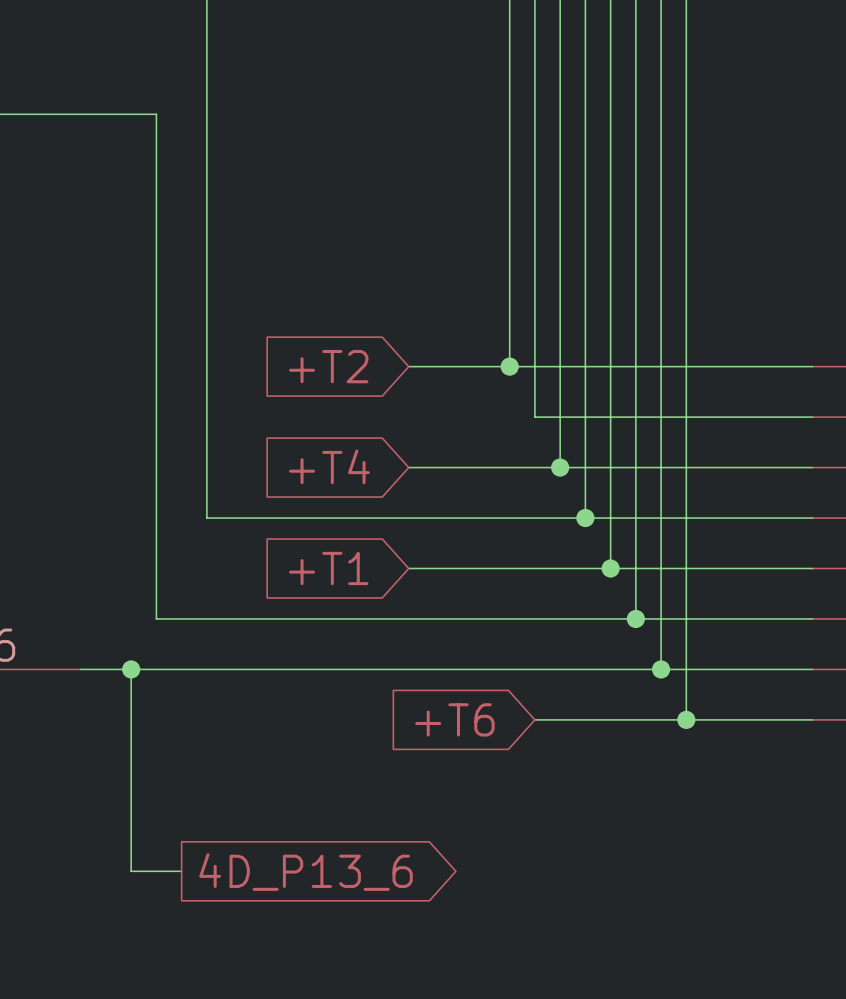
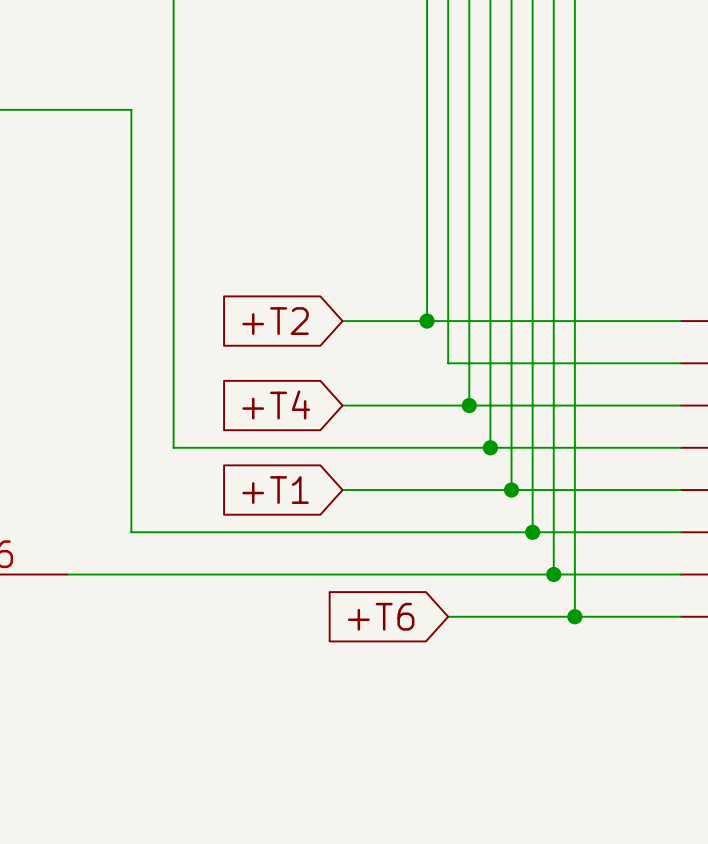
wire: (131, 669) (131, 871) (181, 871) -> none
junction: (131, 669) -> none
global label: 4D_P13_6 (306, 872) -> none

